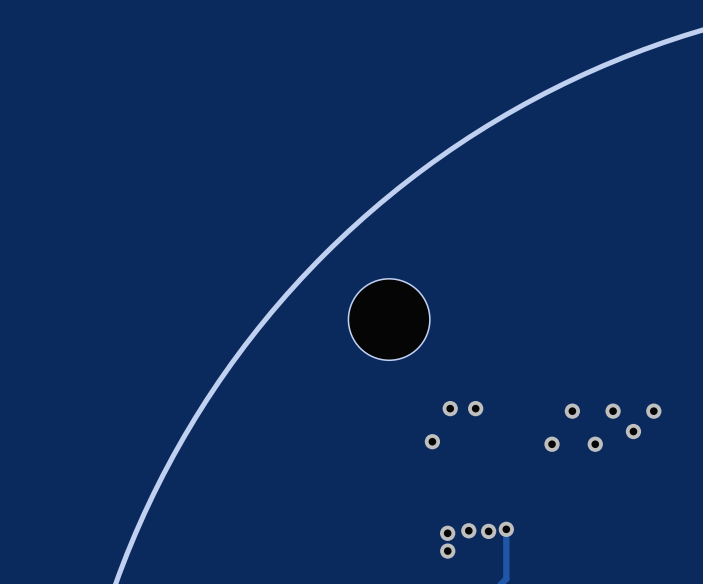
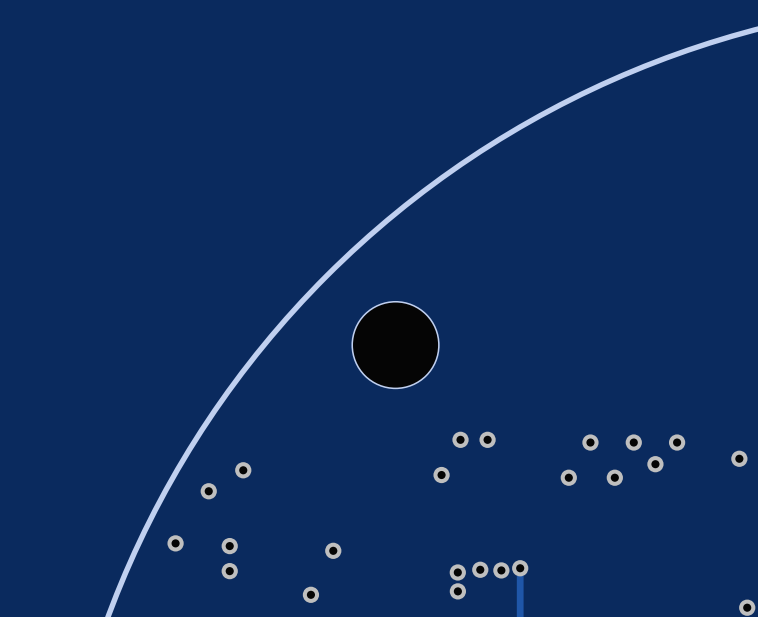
via: none -> (243, 470)
via: none -> (208, 491)
via: none -> (175, 543)
via: none -> (229, 546)
via: none -> (333, 550)
via: none -> (229, 571)
via: none -> (310, 594)

